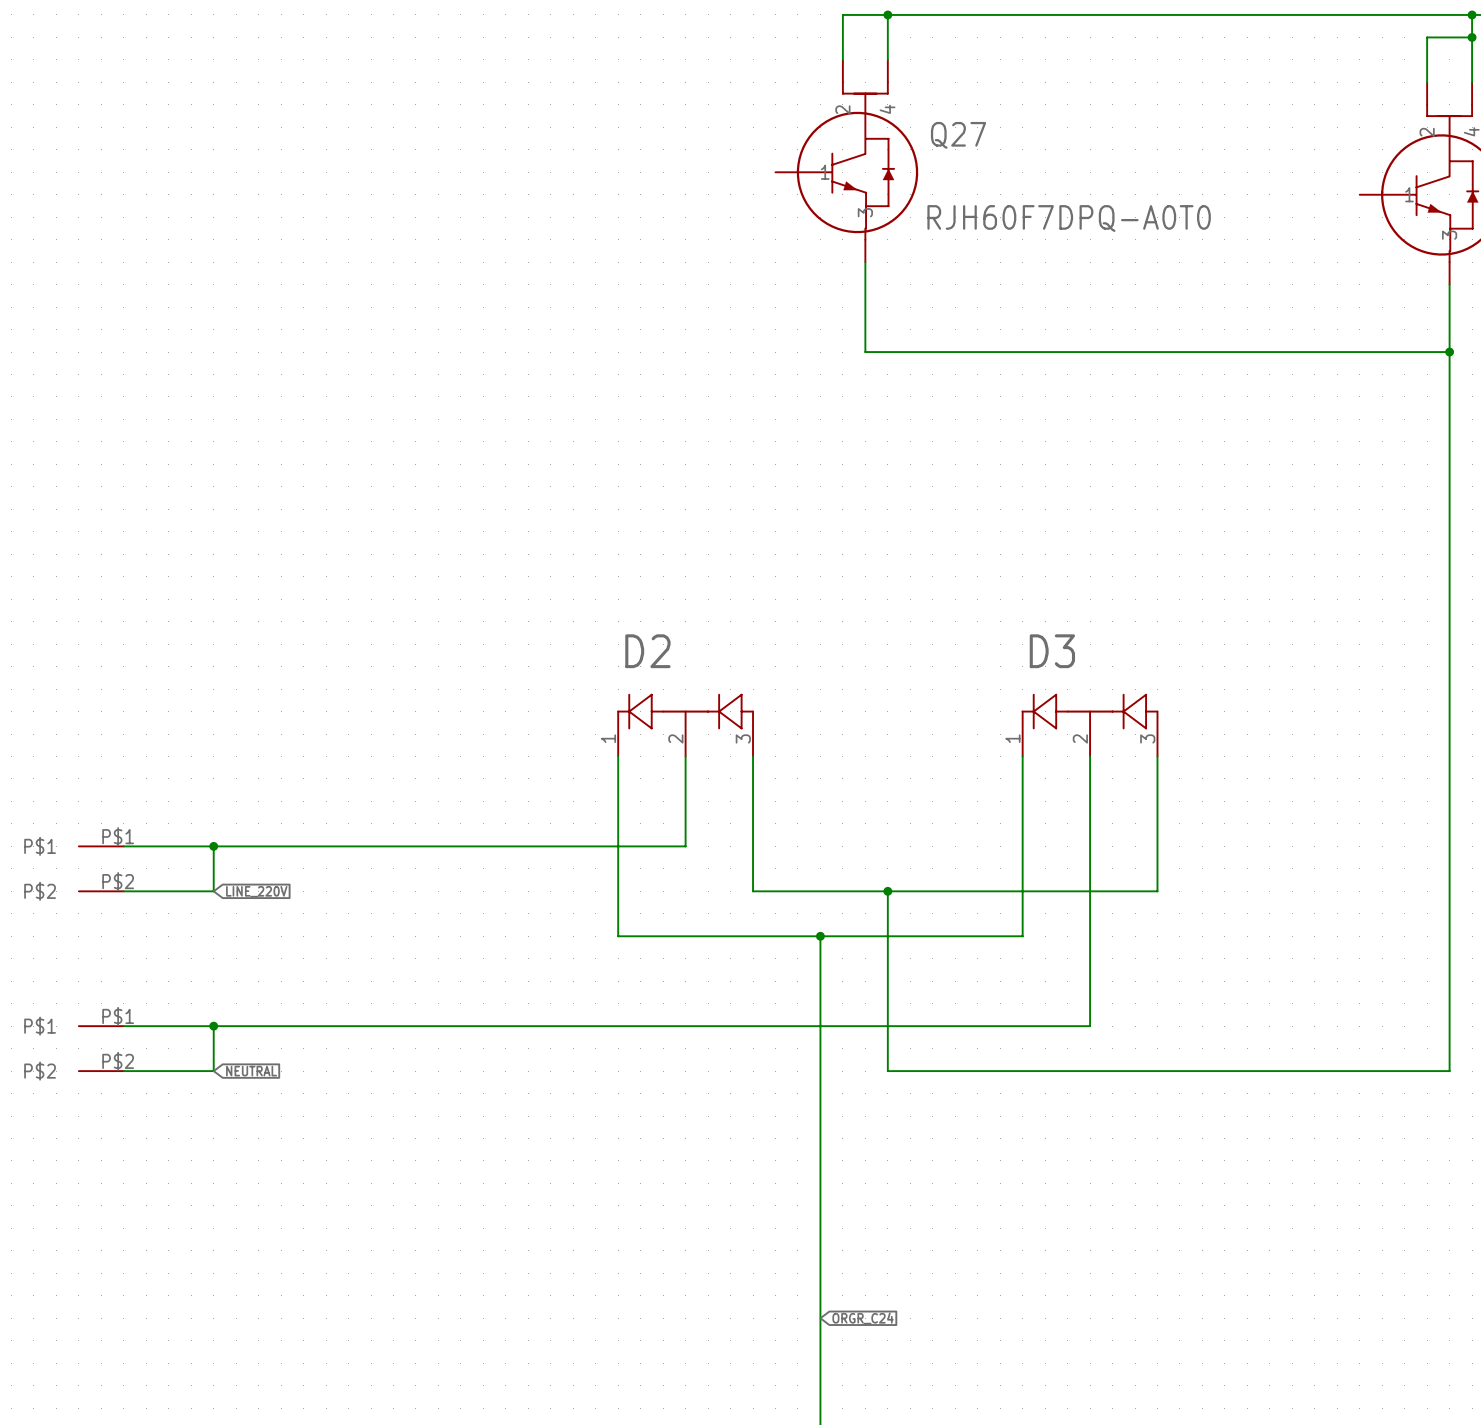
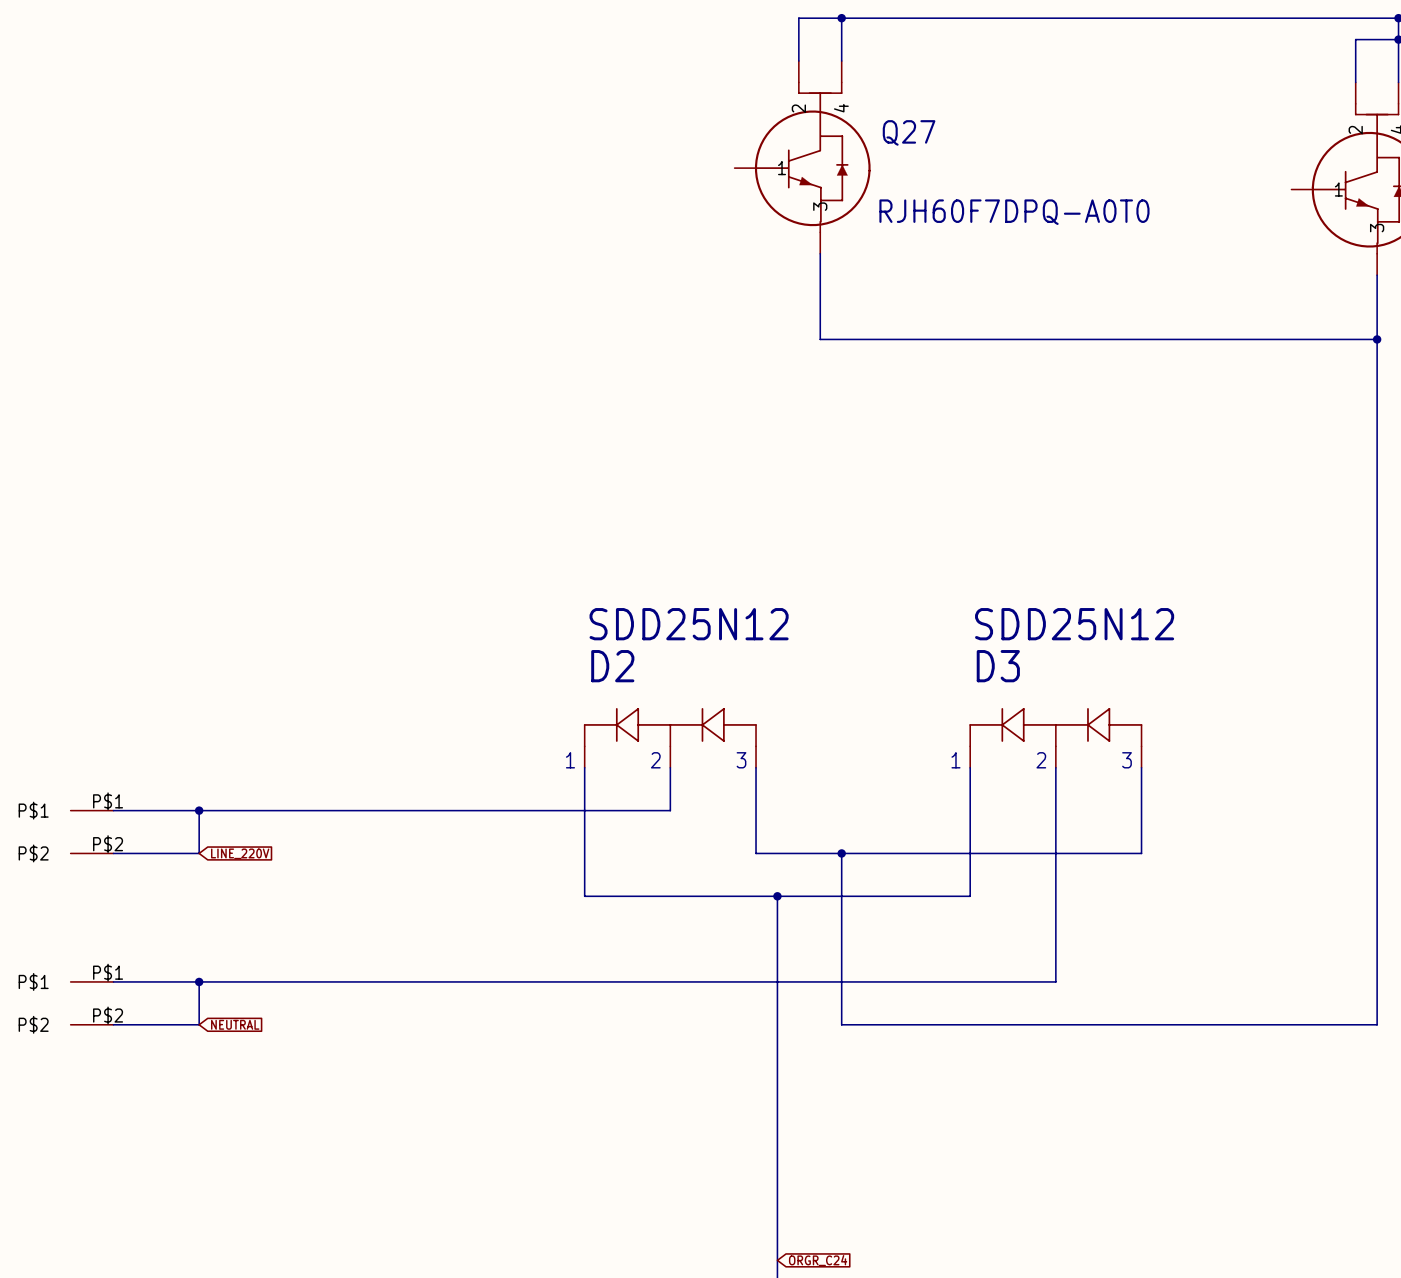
D2 value: none -> SDD25N12 (689, 624)
D3 value: none -> SDD25N12 (1074, 624)
D2 name position: D2 (647, 651) -> D2 (612, 666)
D3 name position: D3 (1052, 651) -> D3 (998, 666)
D2 symbol: [617, 693, 754, 757] -> [583, 708, 757, 768]
D3 symbol: [1021, 693, 1159, 757] -> [969, 708, 1143, 768]
wire: (685, 756) (685, 846) -> (670, 767) (670, 810) (648, 810)
wire: (753, 756) (753, 891) (797, 891) -> (756, 767) (756, 853)
wire: (1090, 756) (1090, 1026) -> (1055, 767) (1055, 981) (1034, 981)
wire: (1157, 756) (1157, 891) -> (1141, 767) (1141, 853) (1098, 853)

